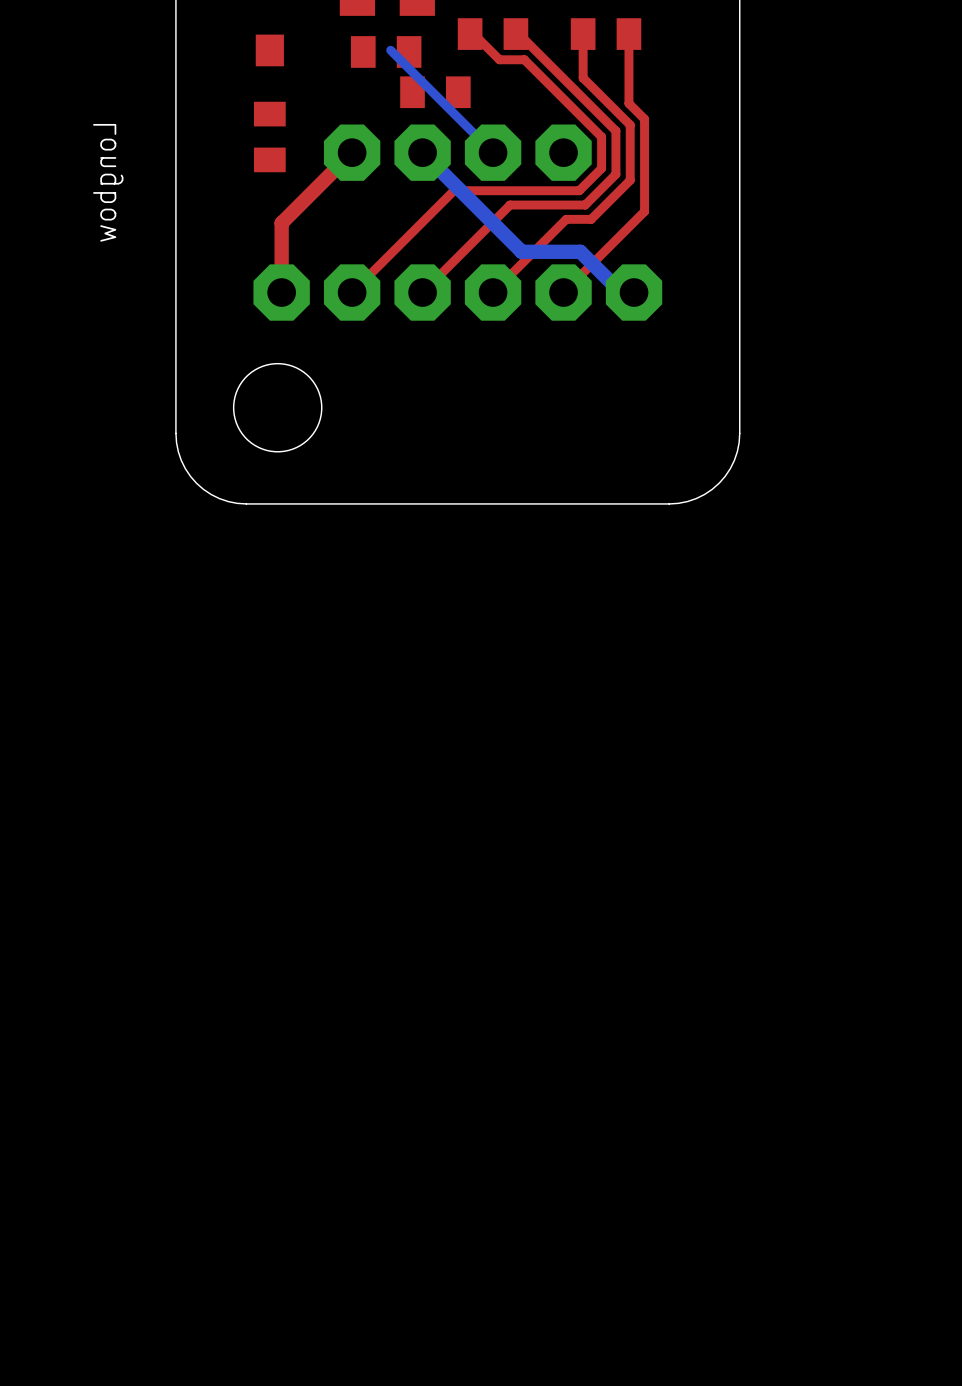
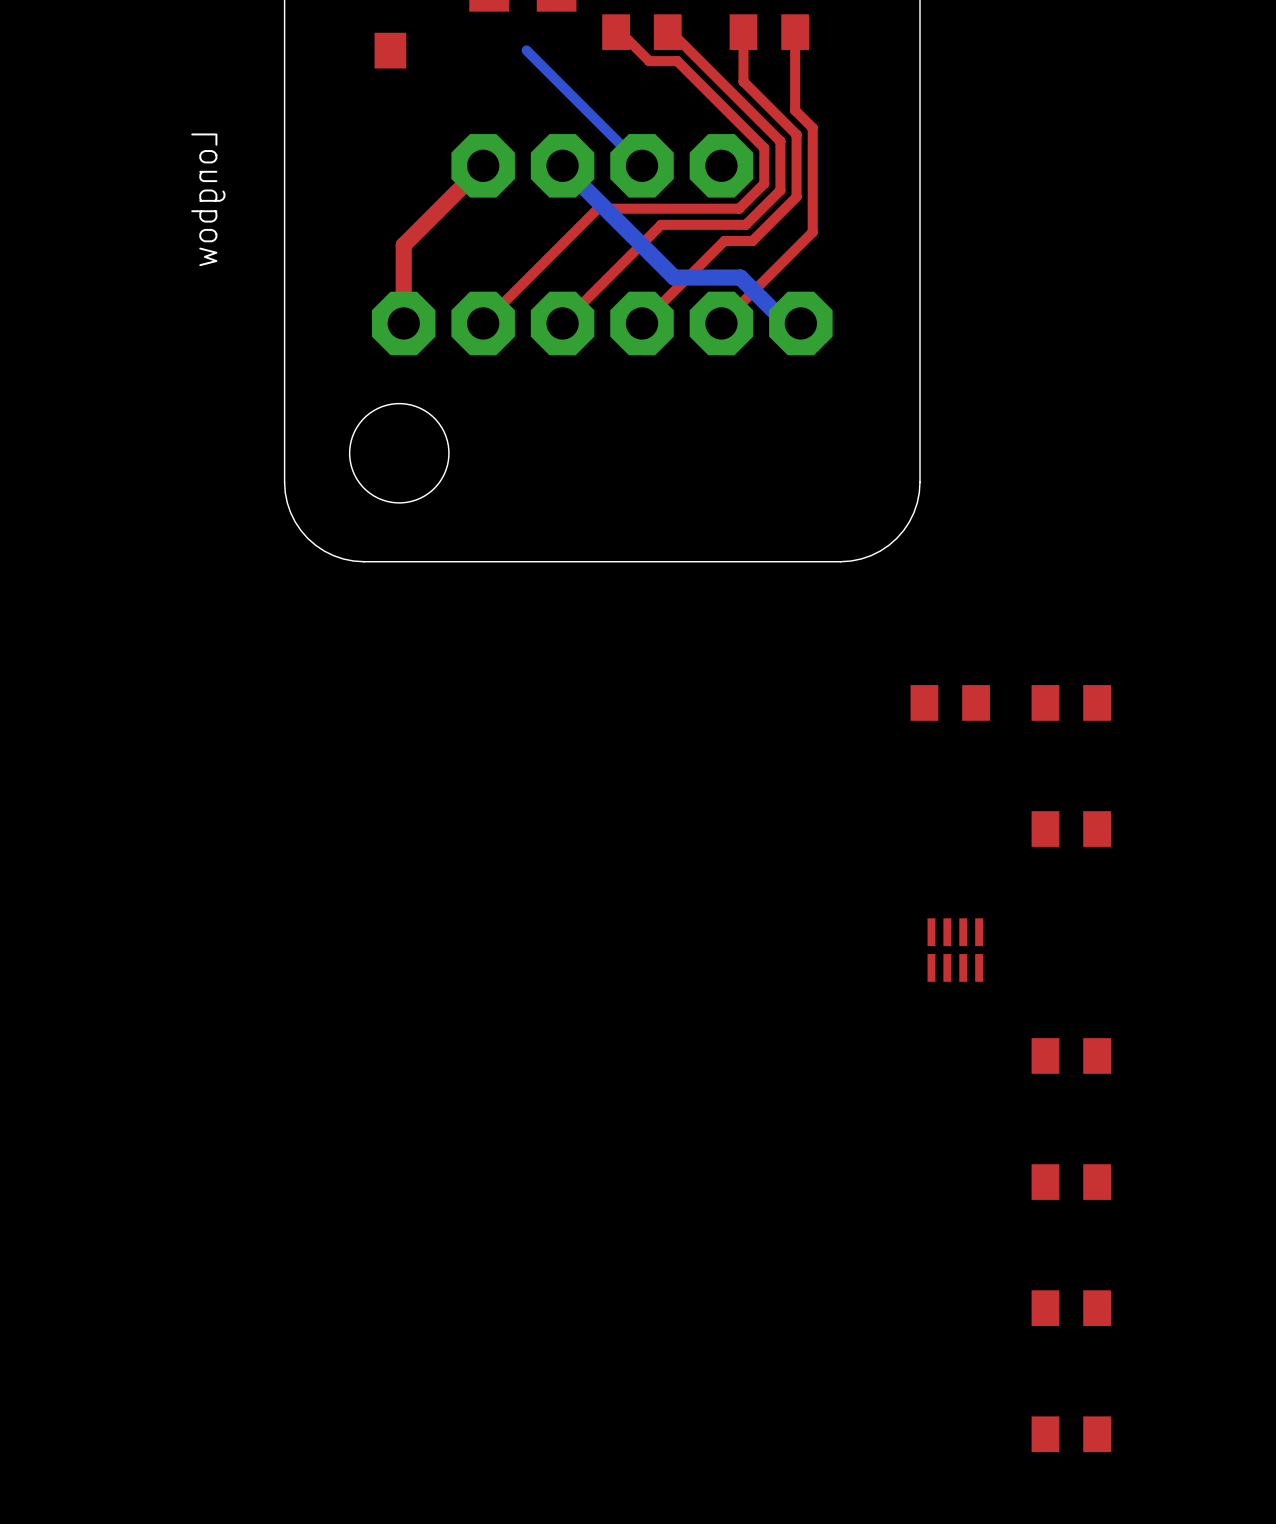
part: (386, 51) -> none
part: (435, 92) -> none
part: (269, 136) -> none
part: none -> (950, 702)
part: none -> (1071, 702)
part: none -> (1071, 829)
part: none -> (955, 950)
part: none -> (1071, 1055)
part: none -> (1071, 1182)
part: none -> (1071, 1308)
part: none -> (1071, 1434)

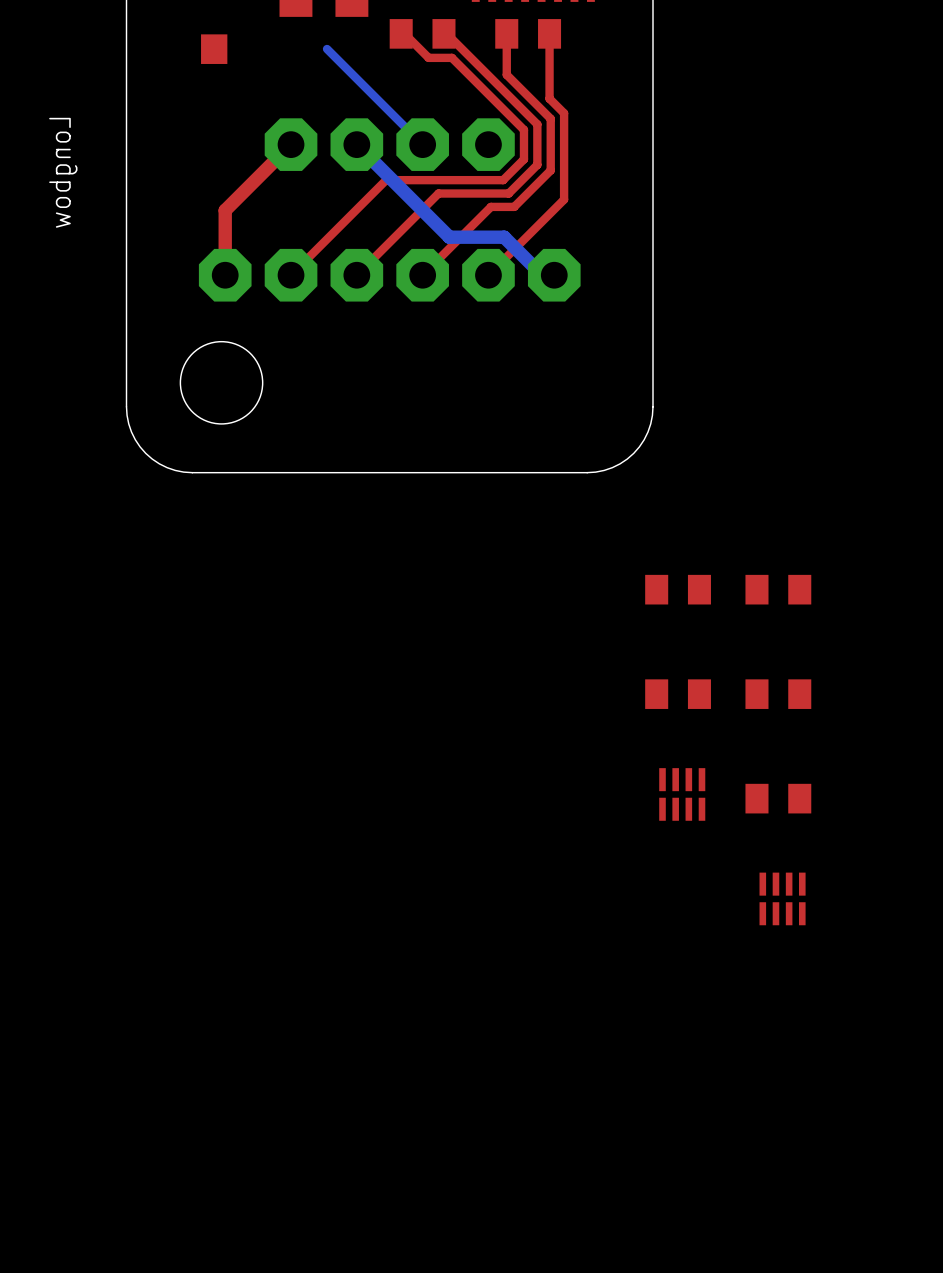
part: none -> (678, 694)
part: none -> (778, 798)
part footprint: [1031, 1038, 1112, 1074] -> [759, 872, 806, 926]
part: (1071, 1182) -> none
part: (1071, 1308) -> none
part: (1071, 1434) -> none

